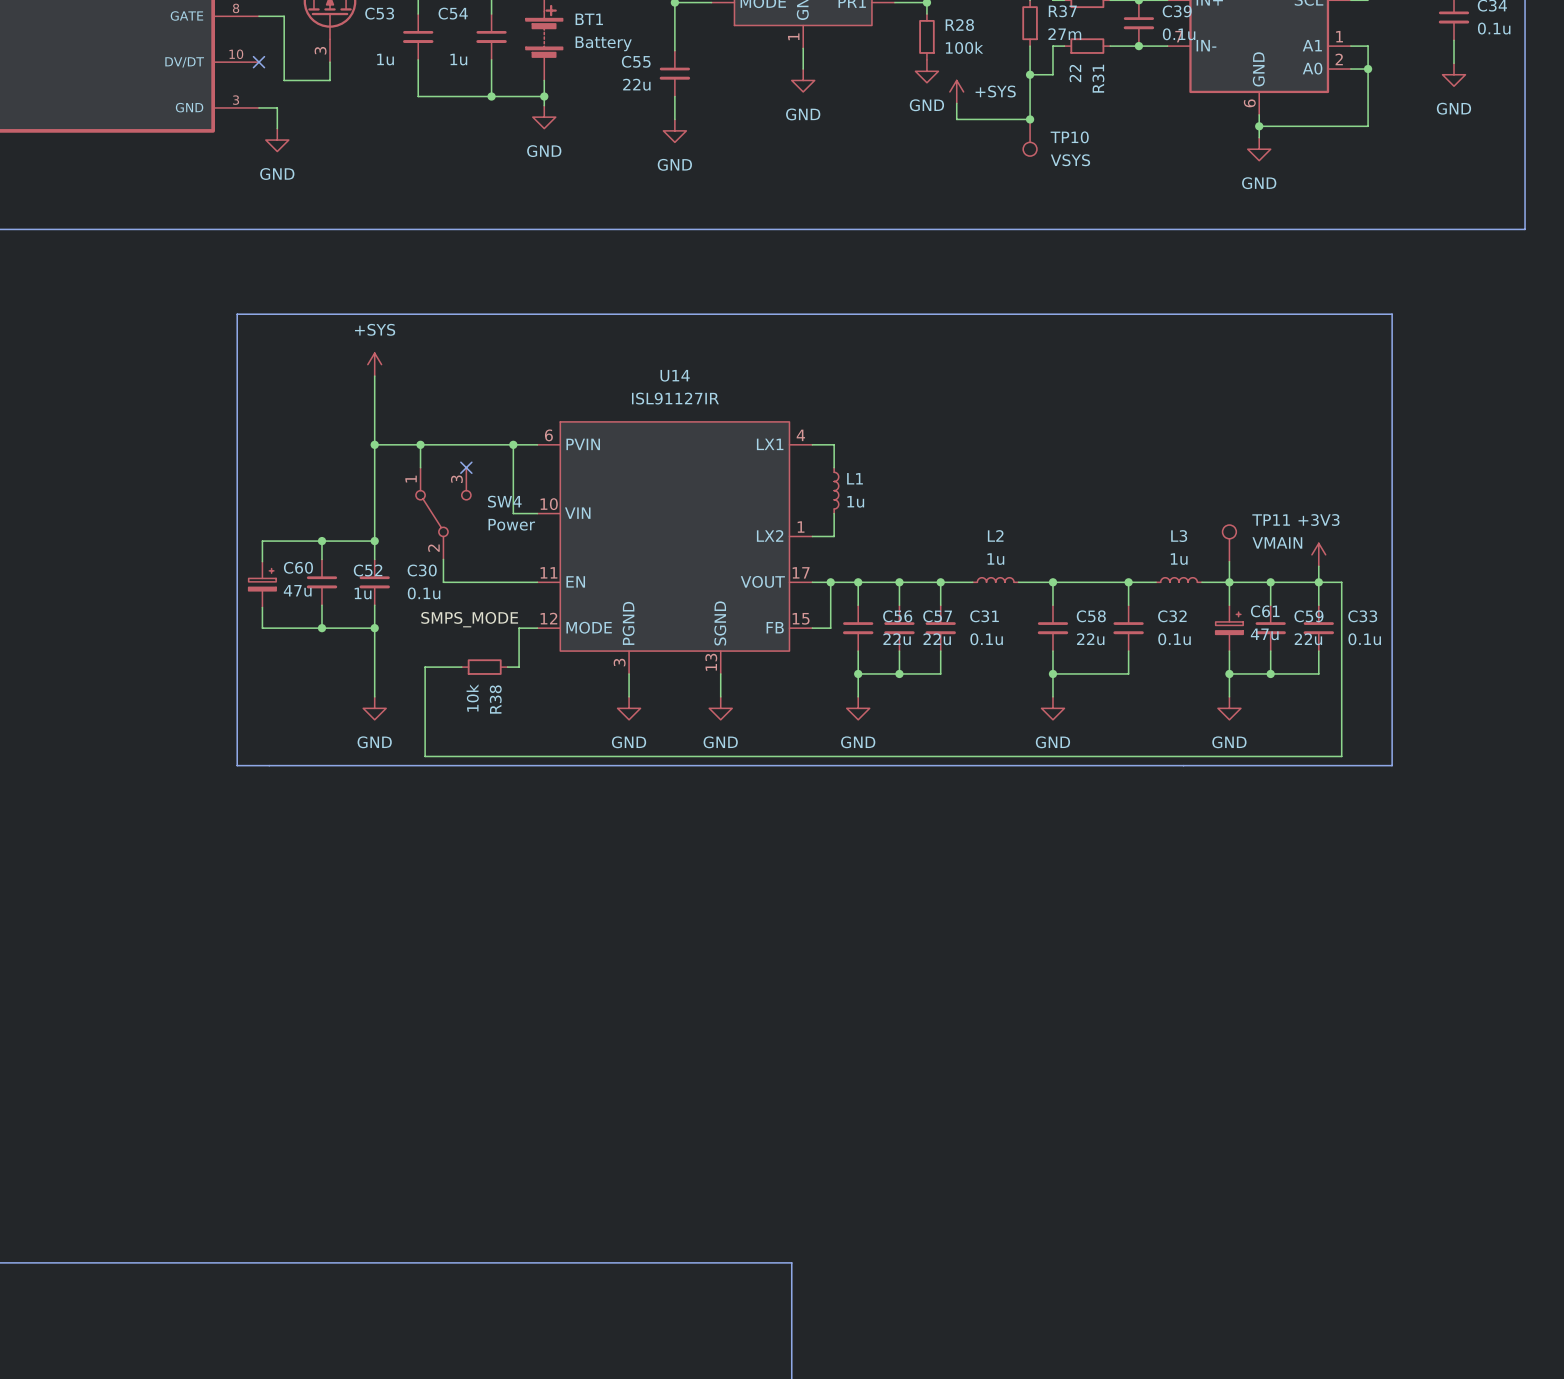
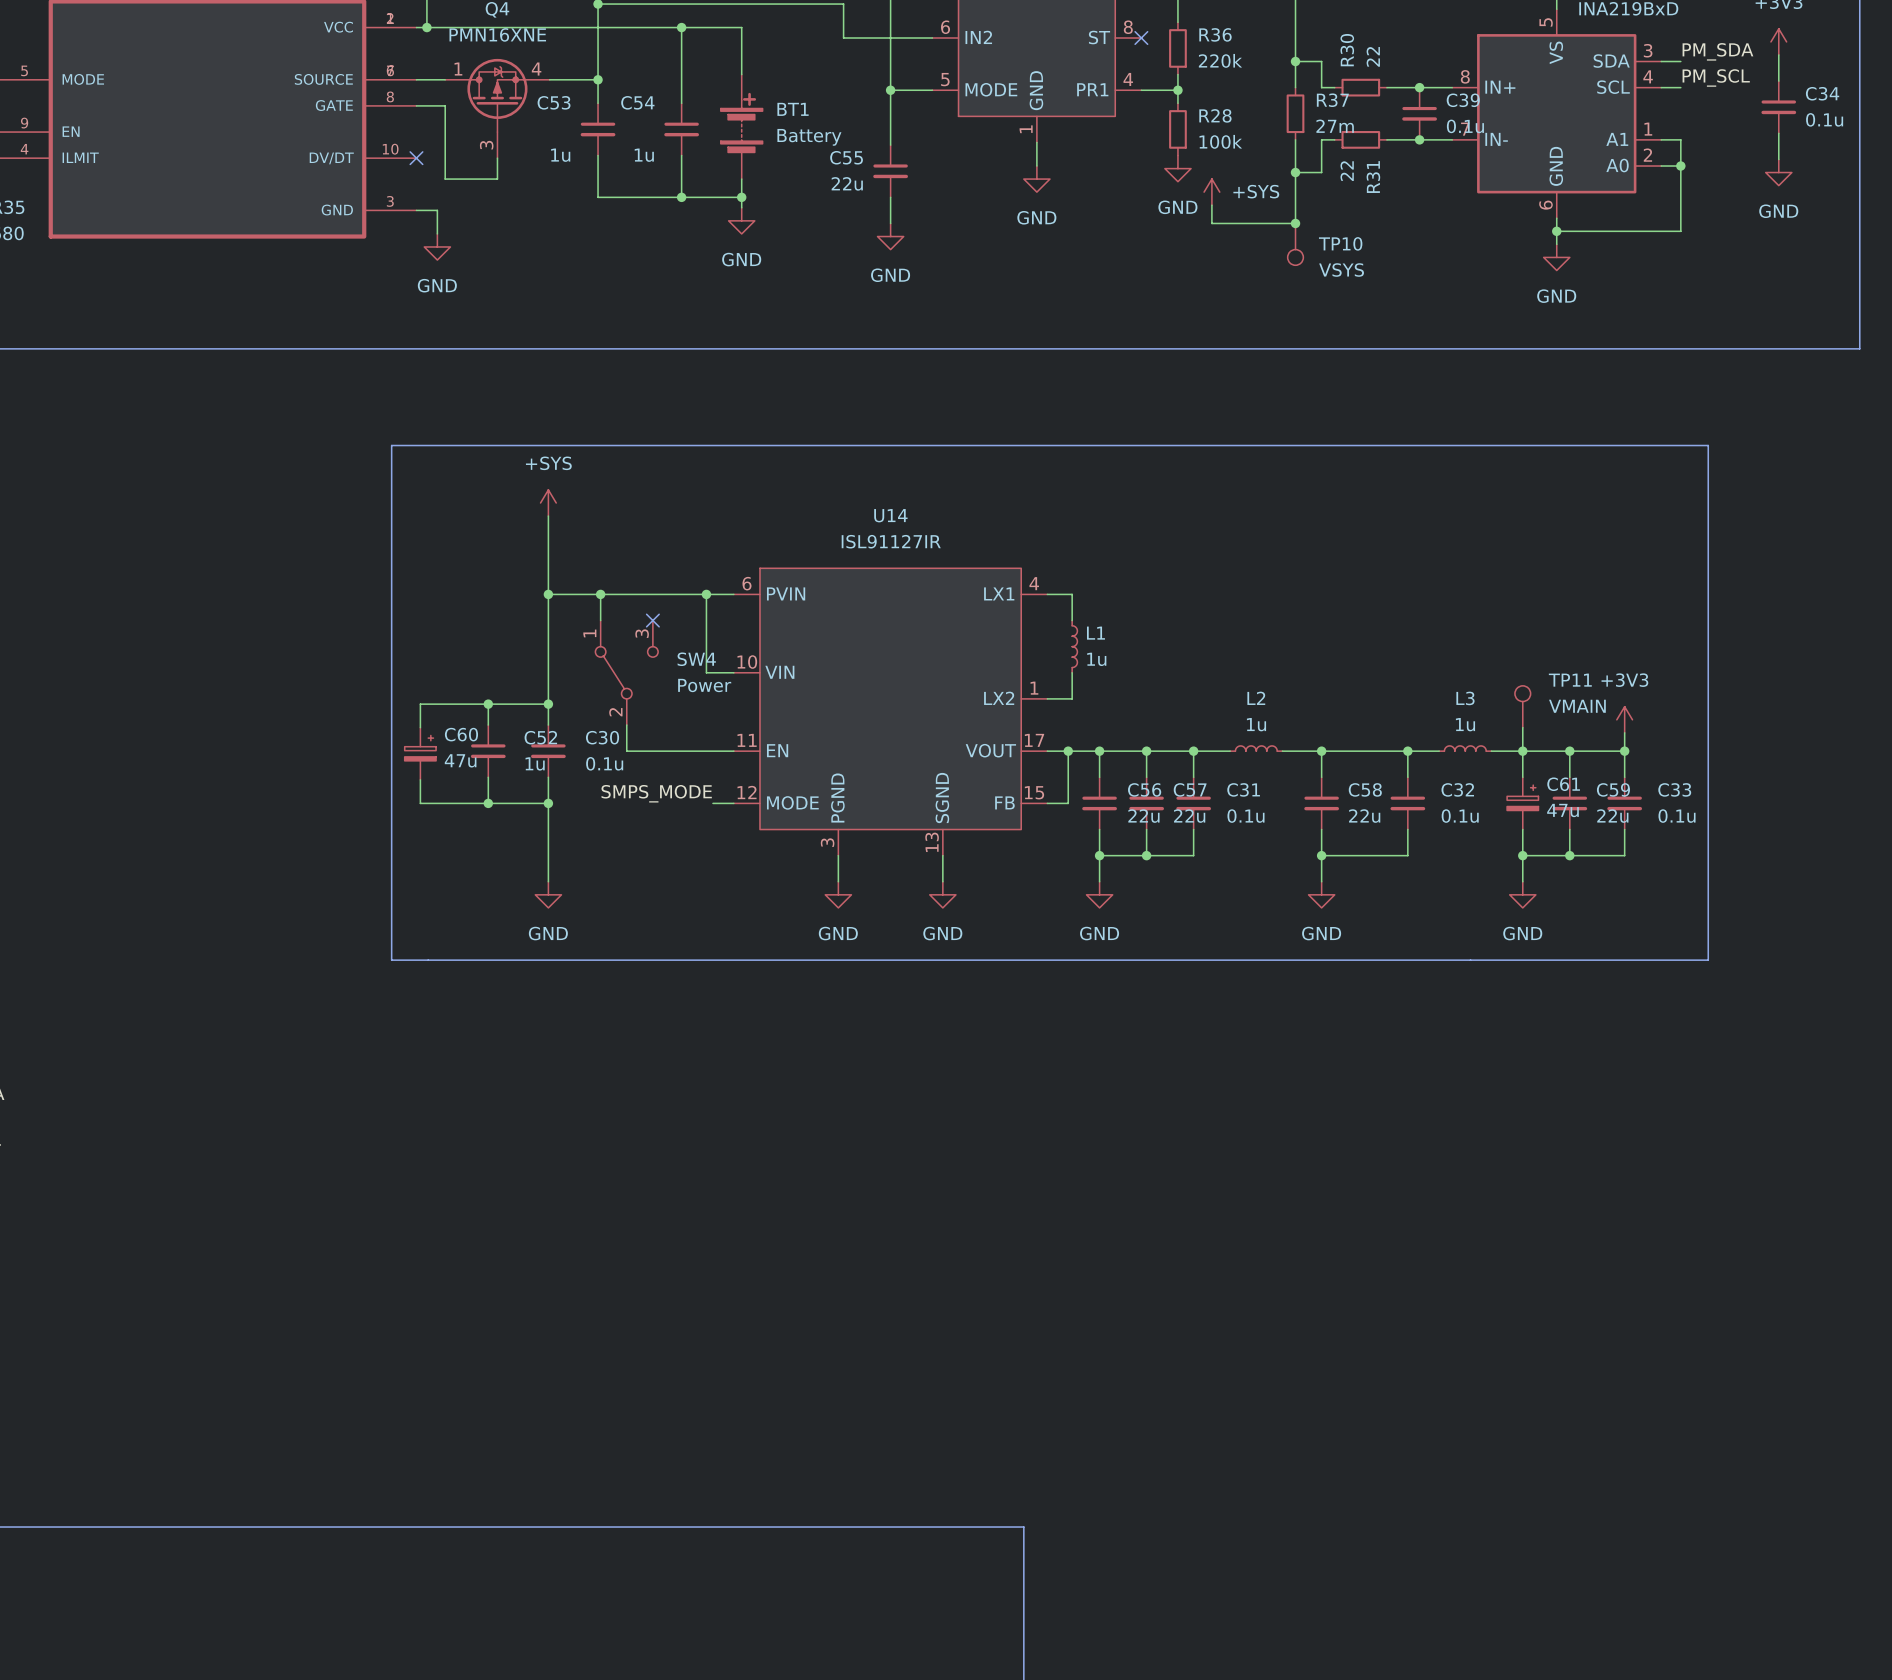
wire: (1318, 582) (1341, 582) (1341, 756) (425, 756) (425, 667) (461, 667) -> none
wire: (519, 628) (519, 667) (507, 667) -> none
R38: 10k (484, 667) -> none

